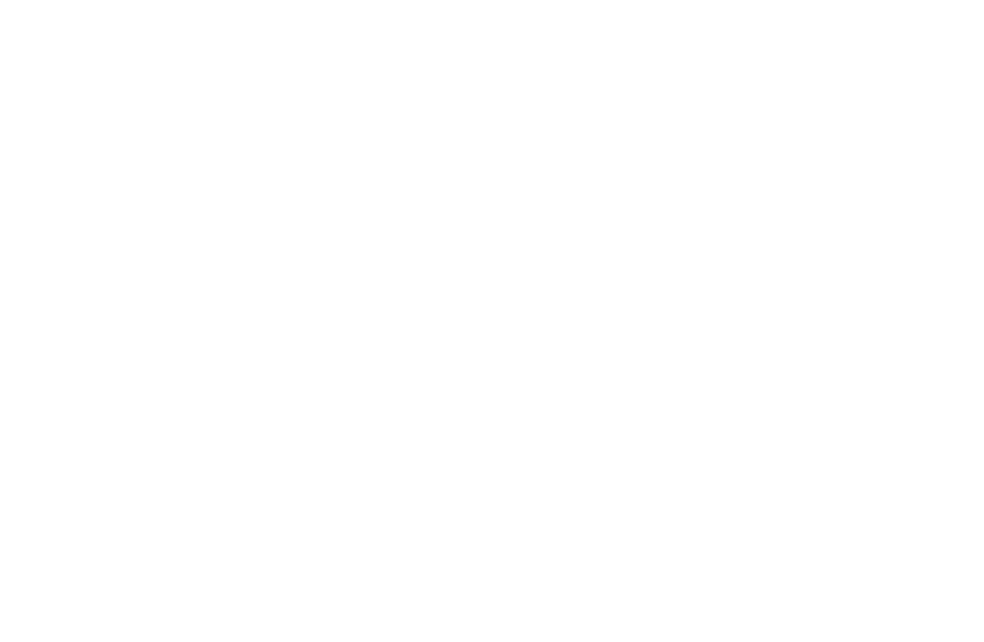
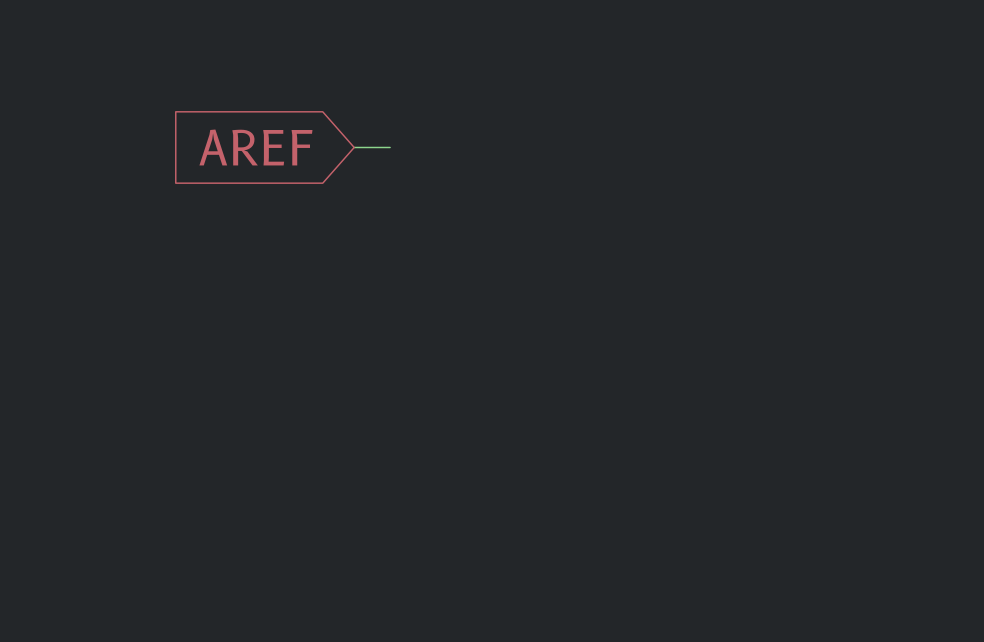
global label: none -> AREF (255, 147)
wire: none -> (354, 147) (390, 147)

